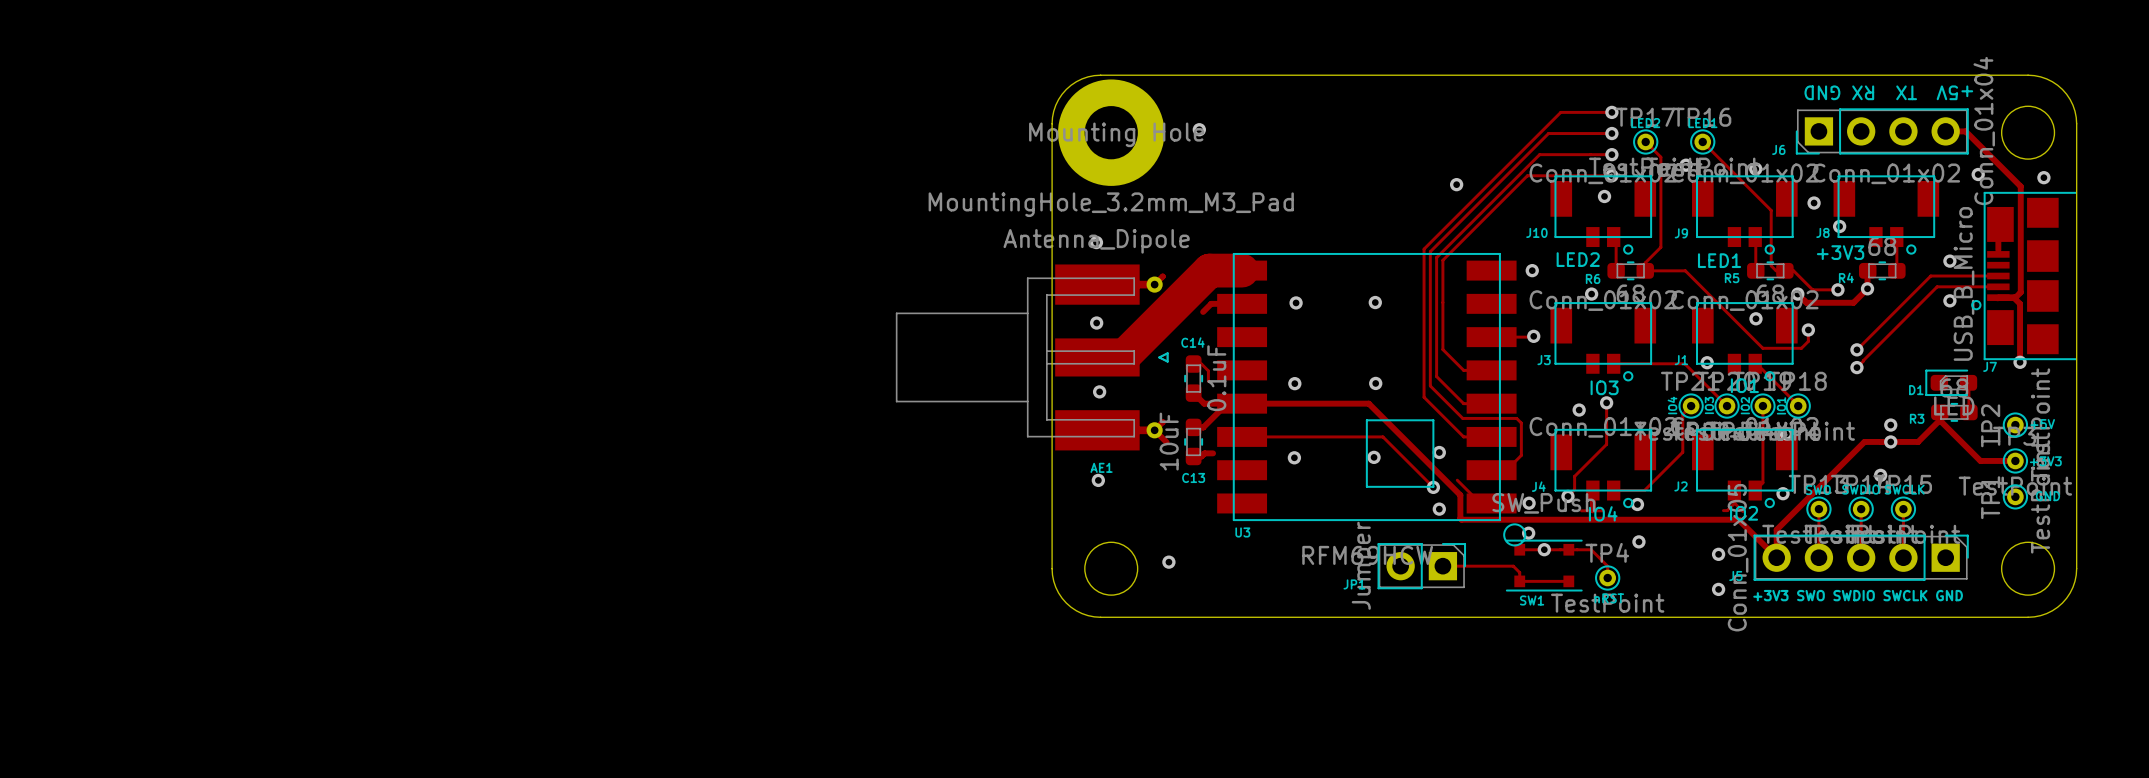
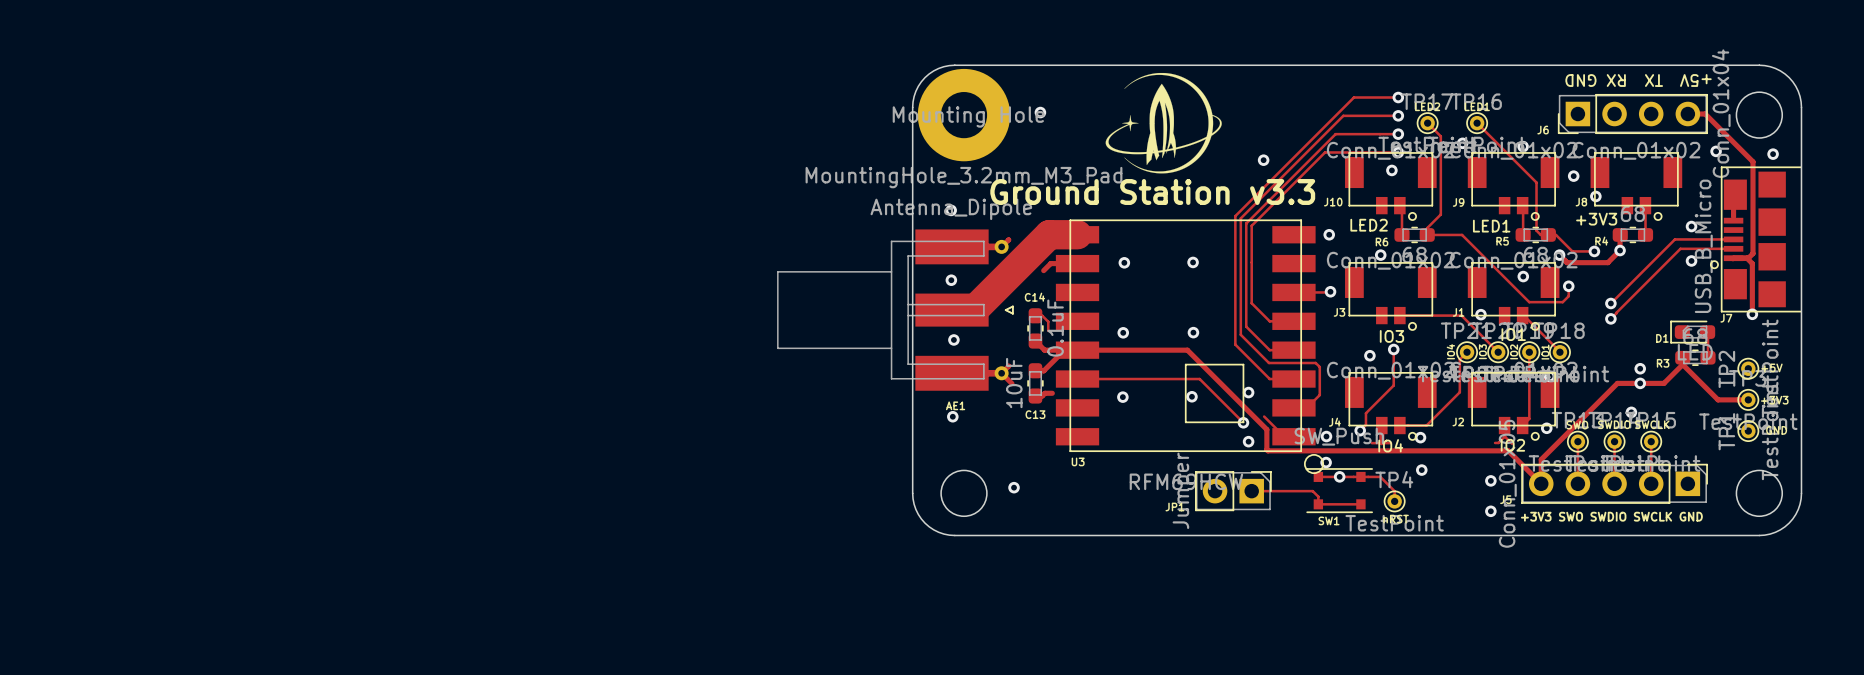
drawing: none -> [1105, 72, 1222, 174]
text: none -> Ground Station v3.3 (1152, 191)

